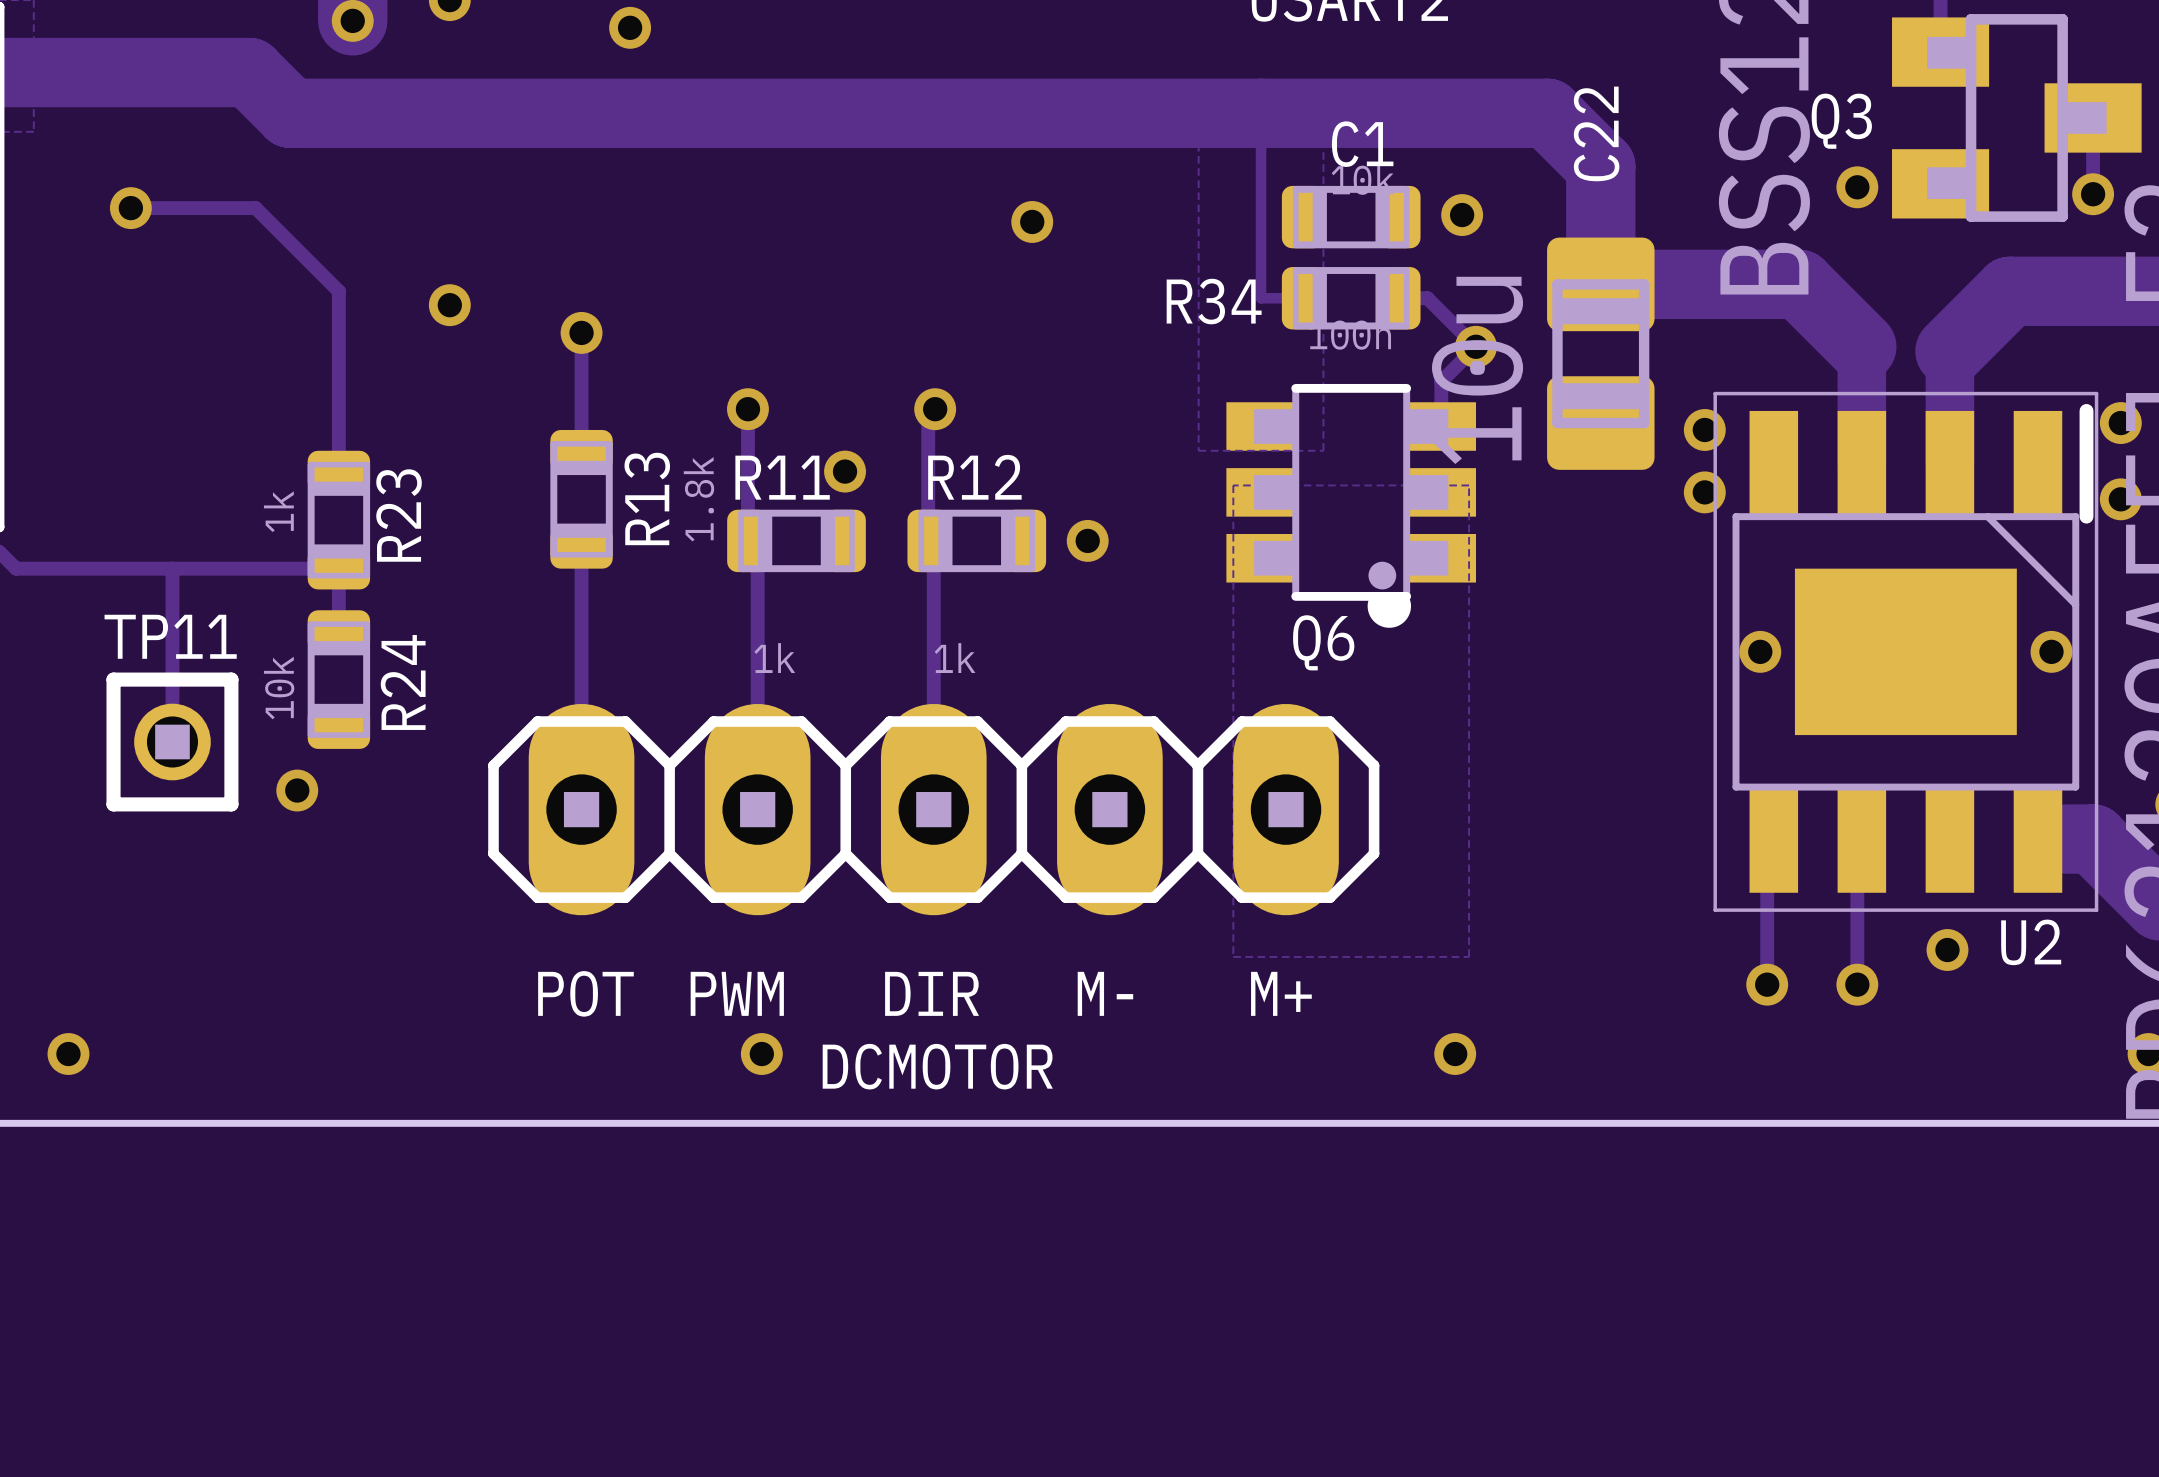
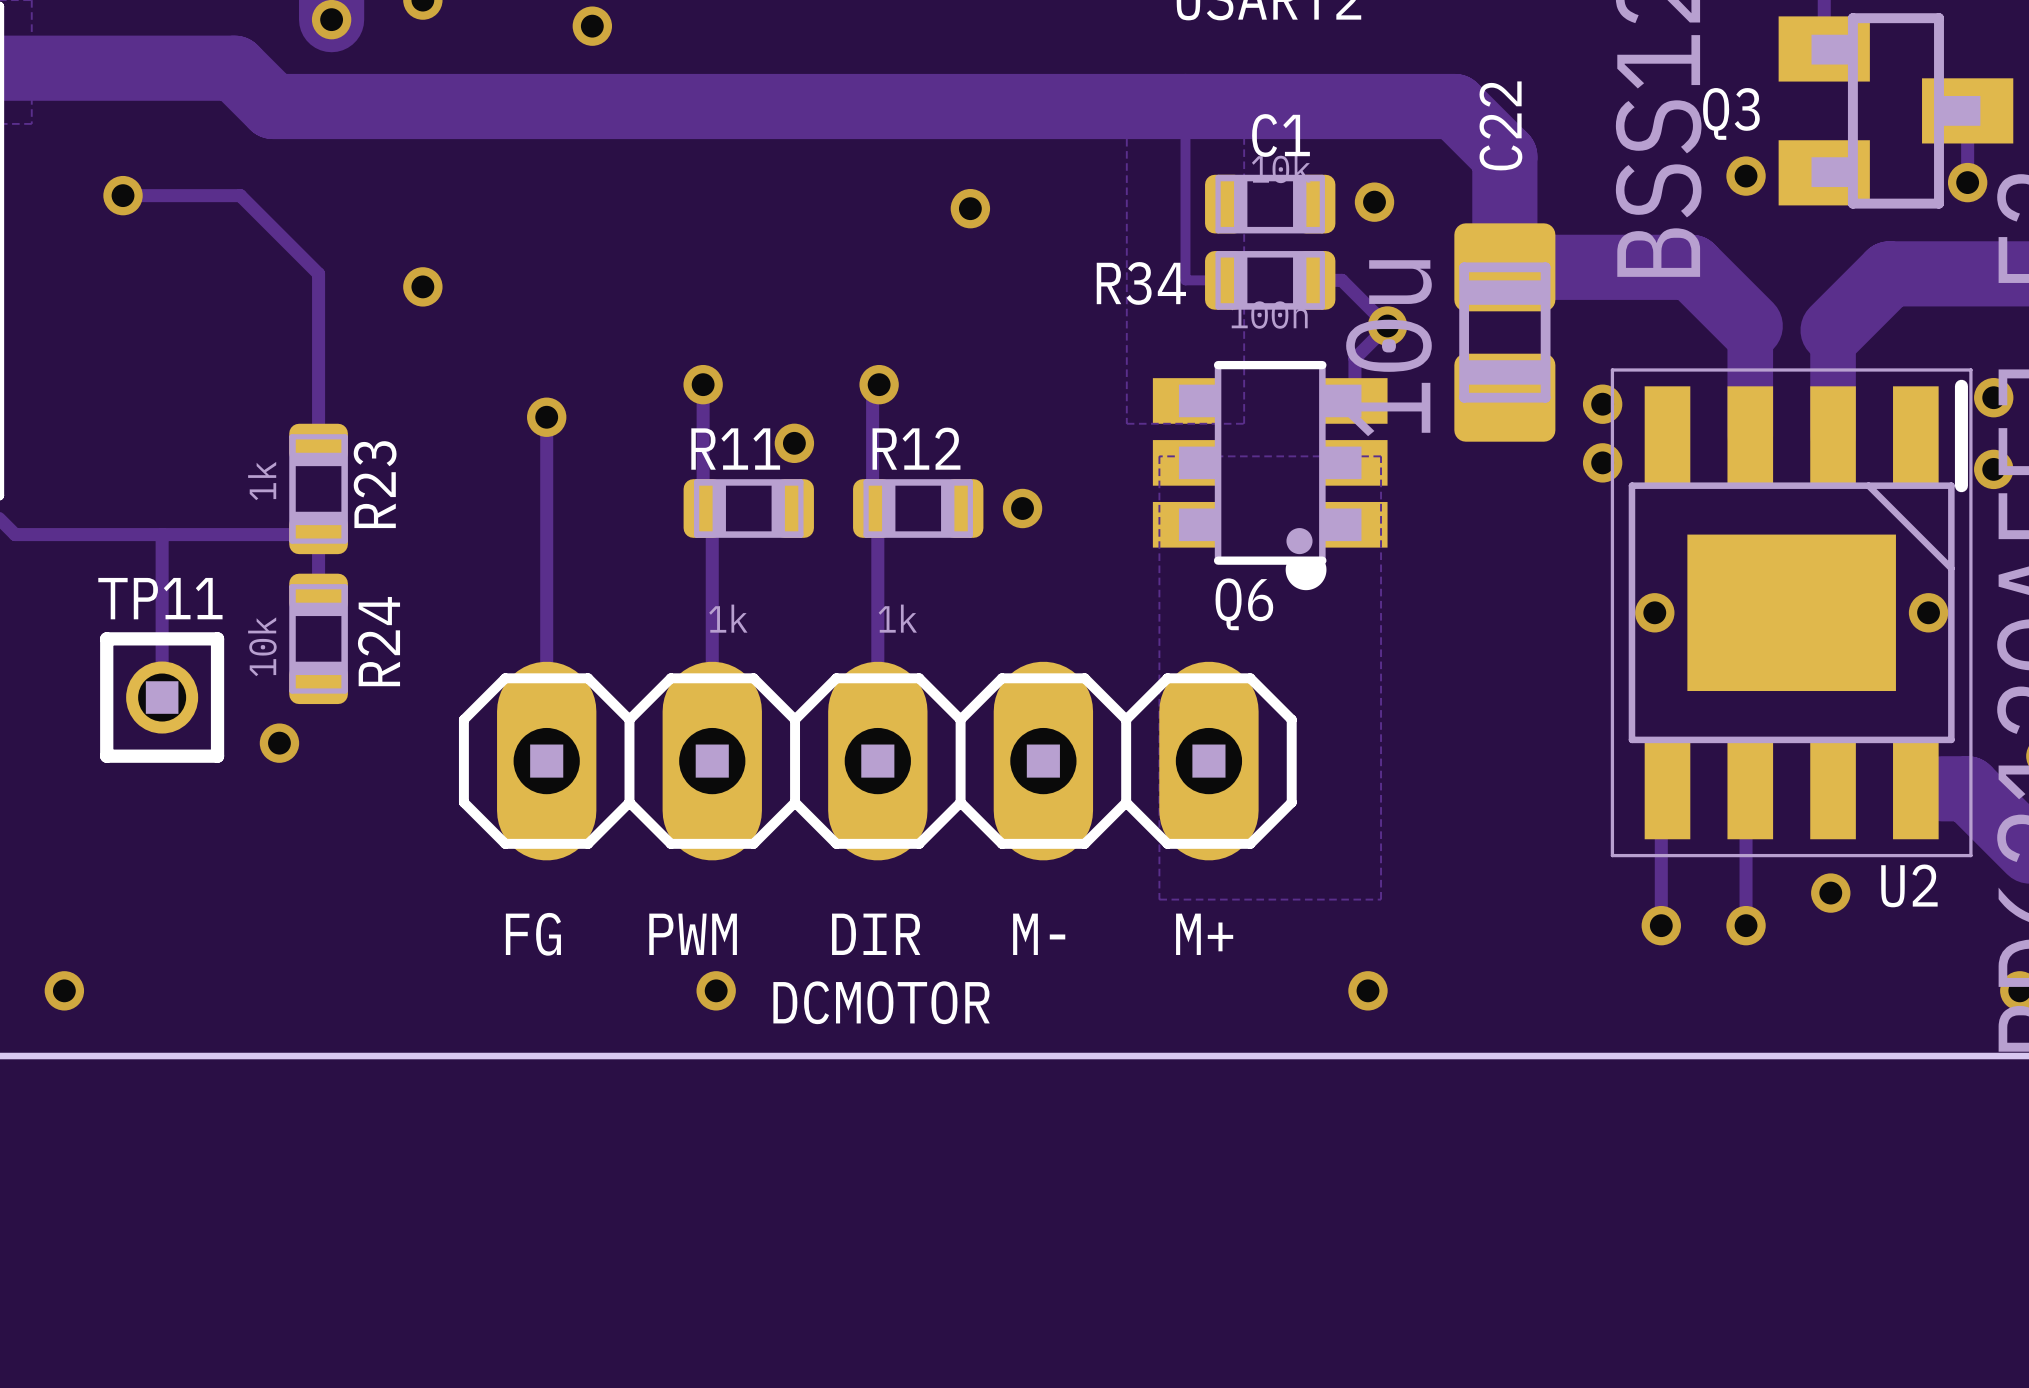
track: (581, 332) (581, 443) -> none
via position: (581, 332) -> (546, 417)
track: none -> (546, 423) (546, 515)
R13: 1.8k (581, 499) -> none
text: POT (585, 993) -> FG (533, 934)

